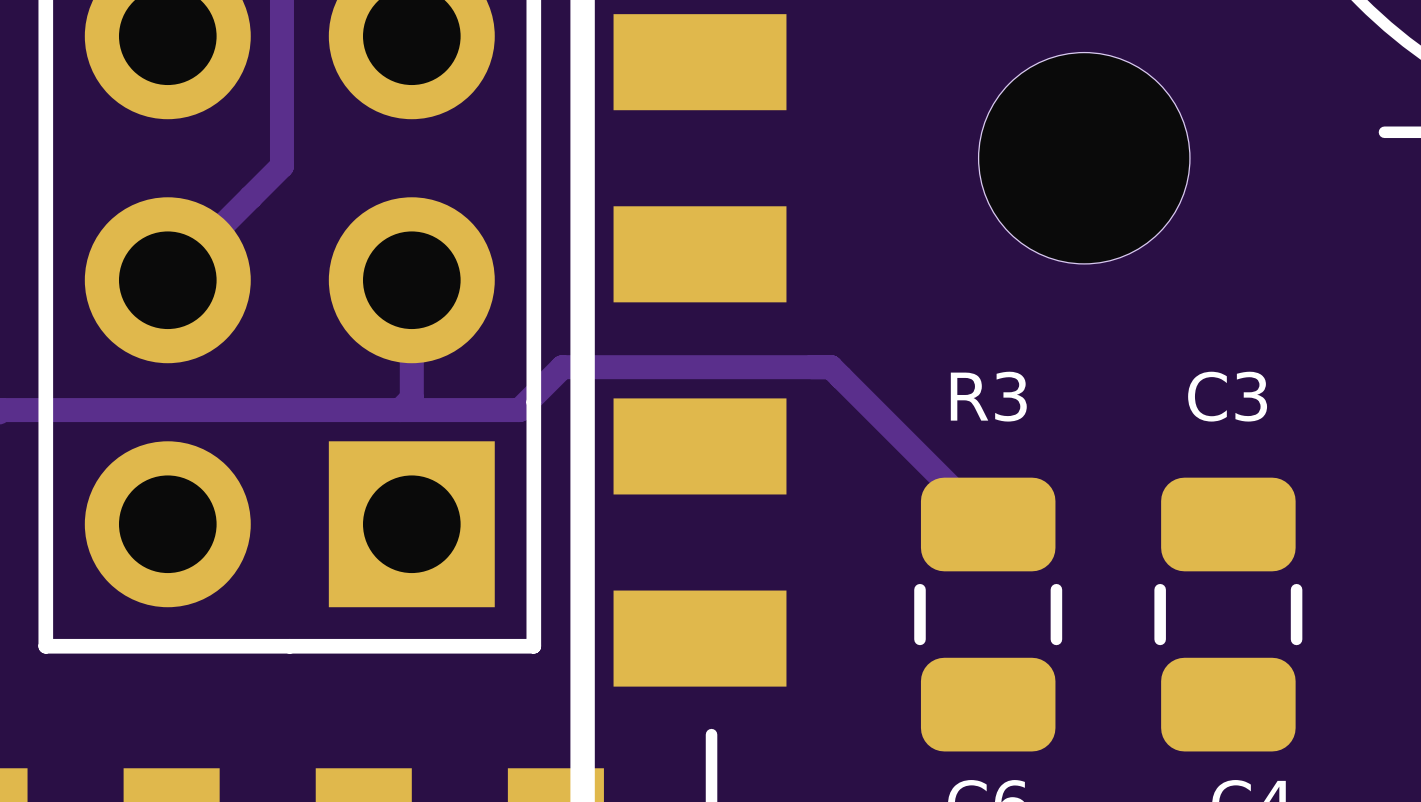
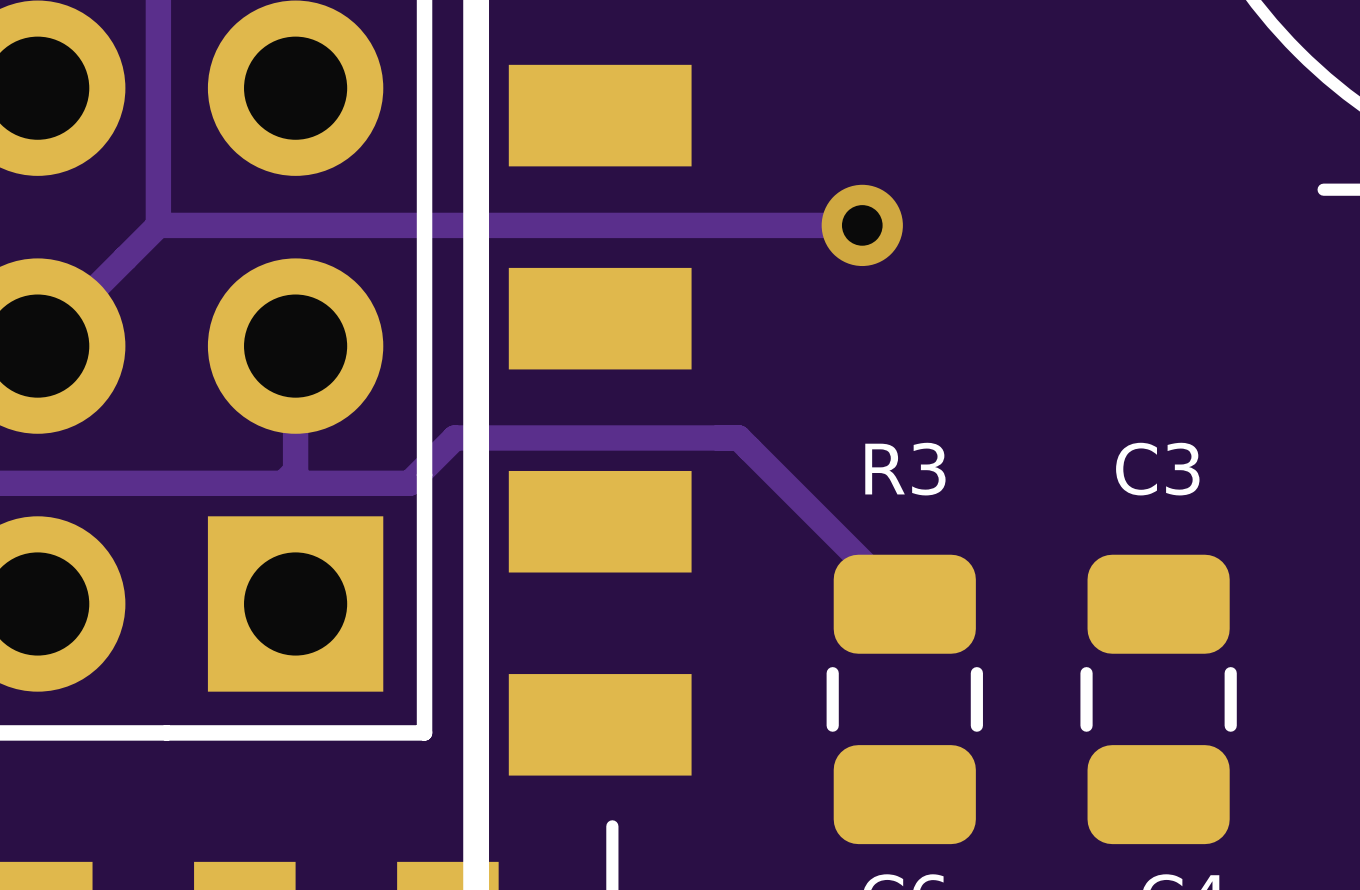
part: (1084, 158) -> none
track: none -> (158, 225) (862, 225)
via: none -> (862, 225)

